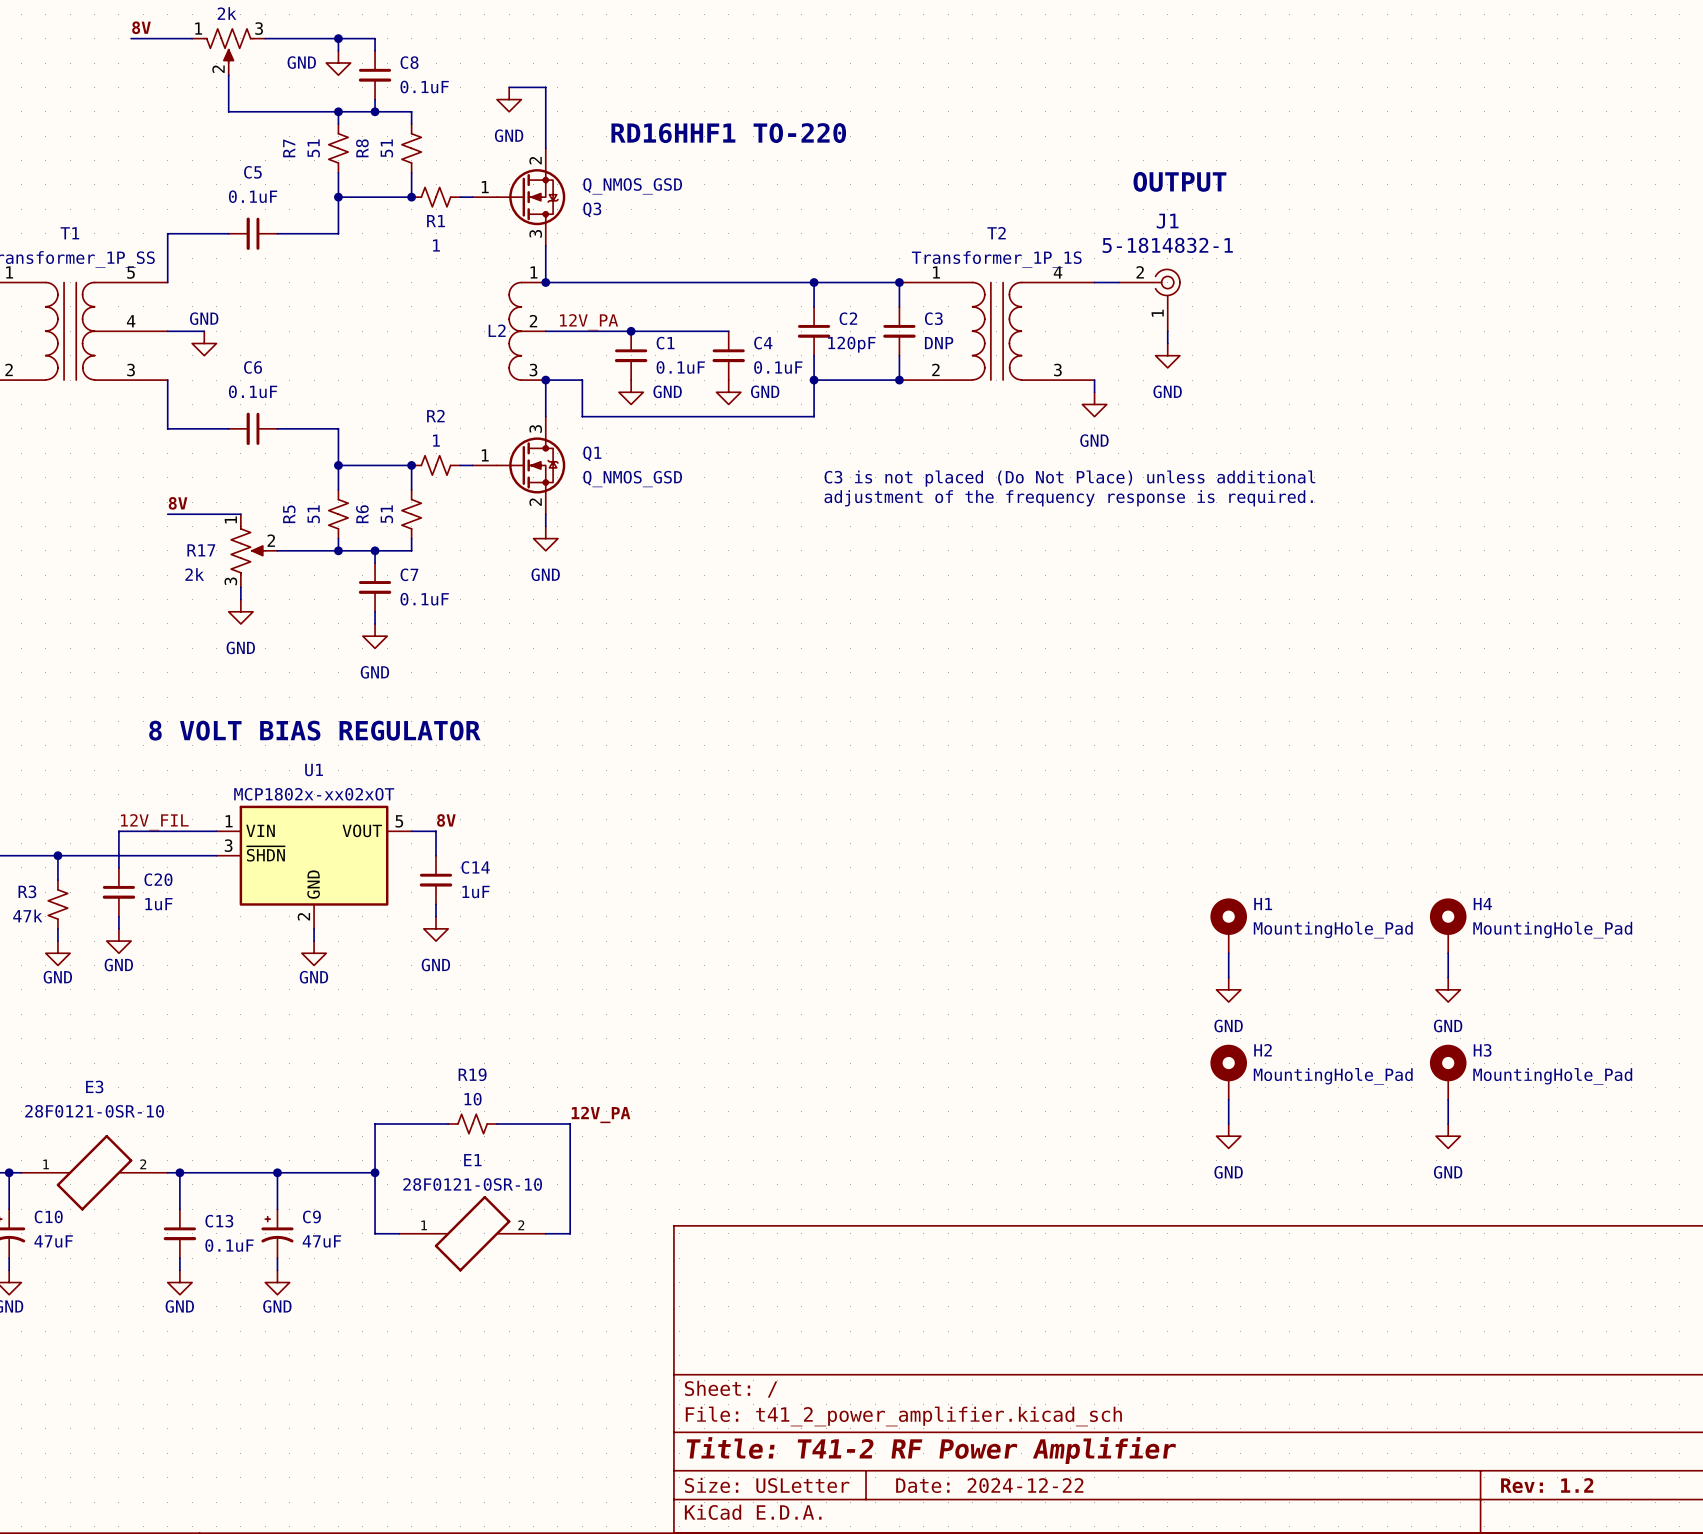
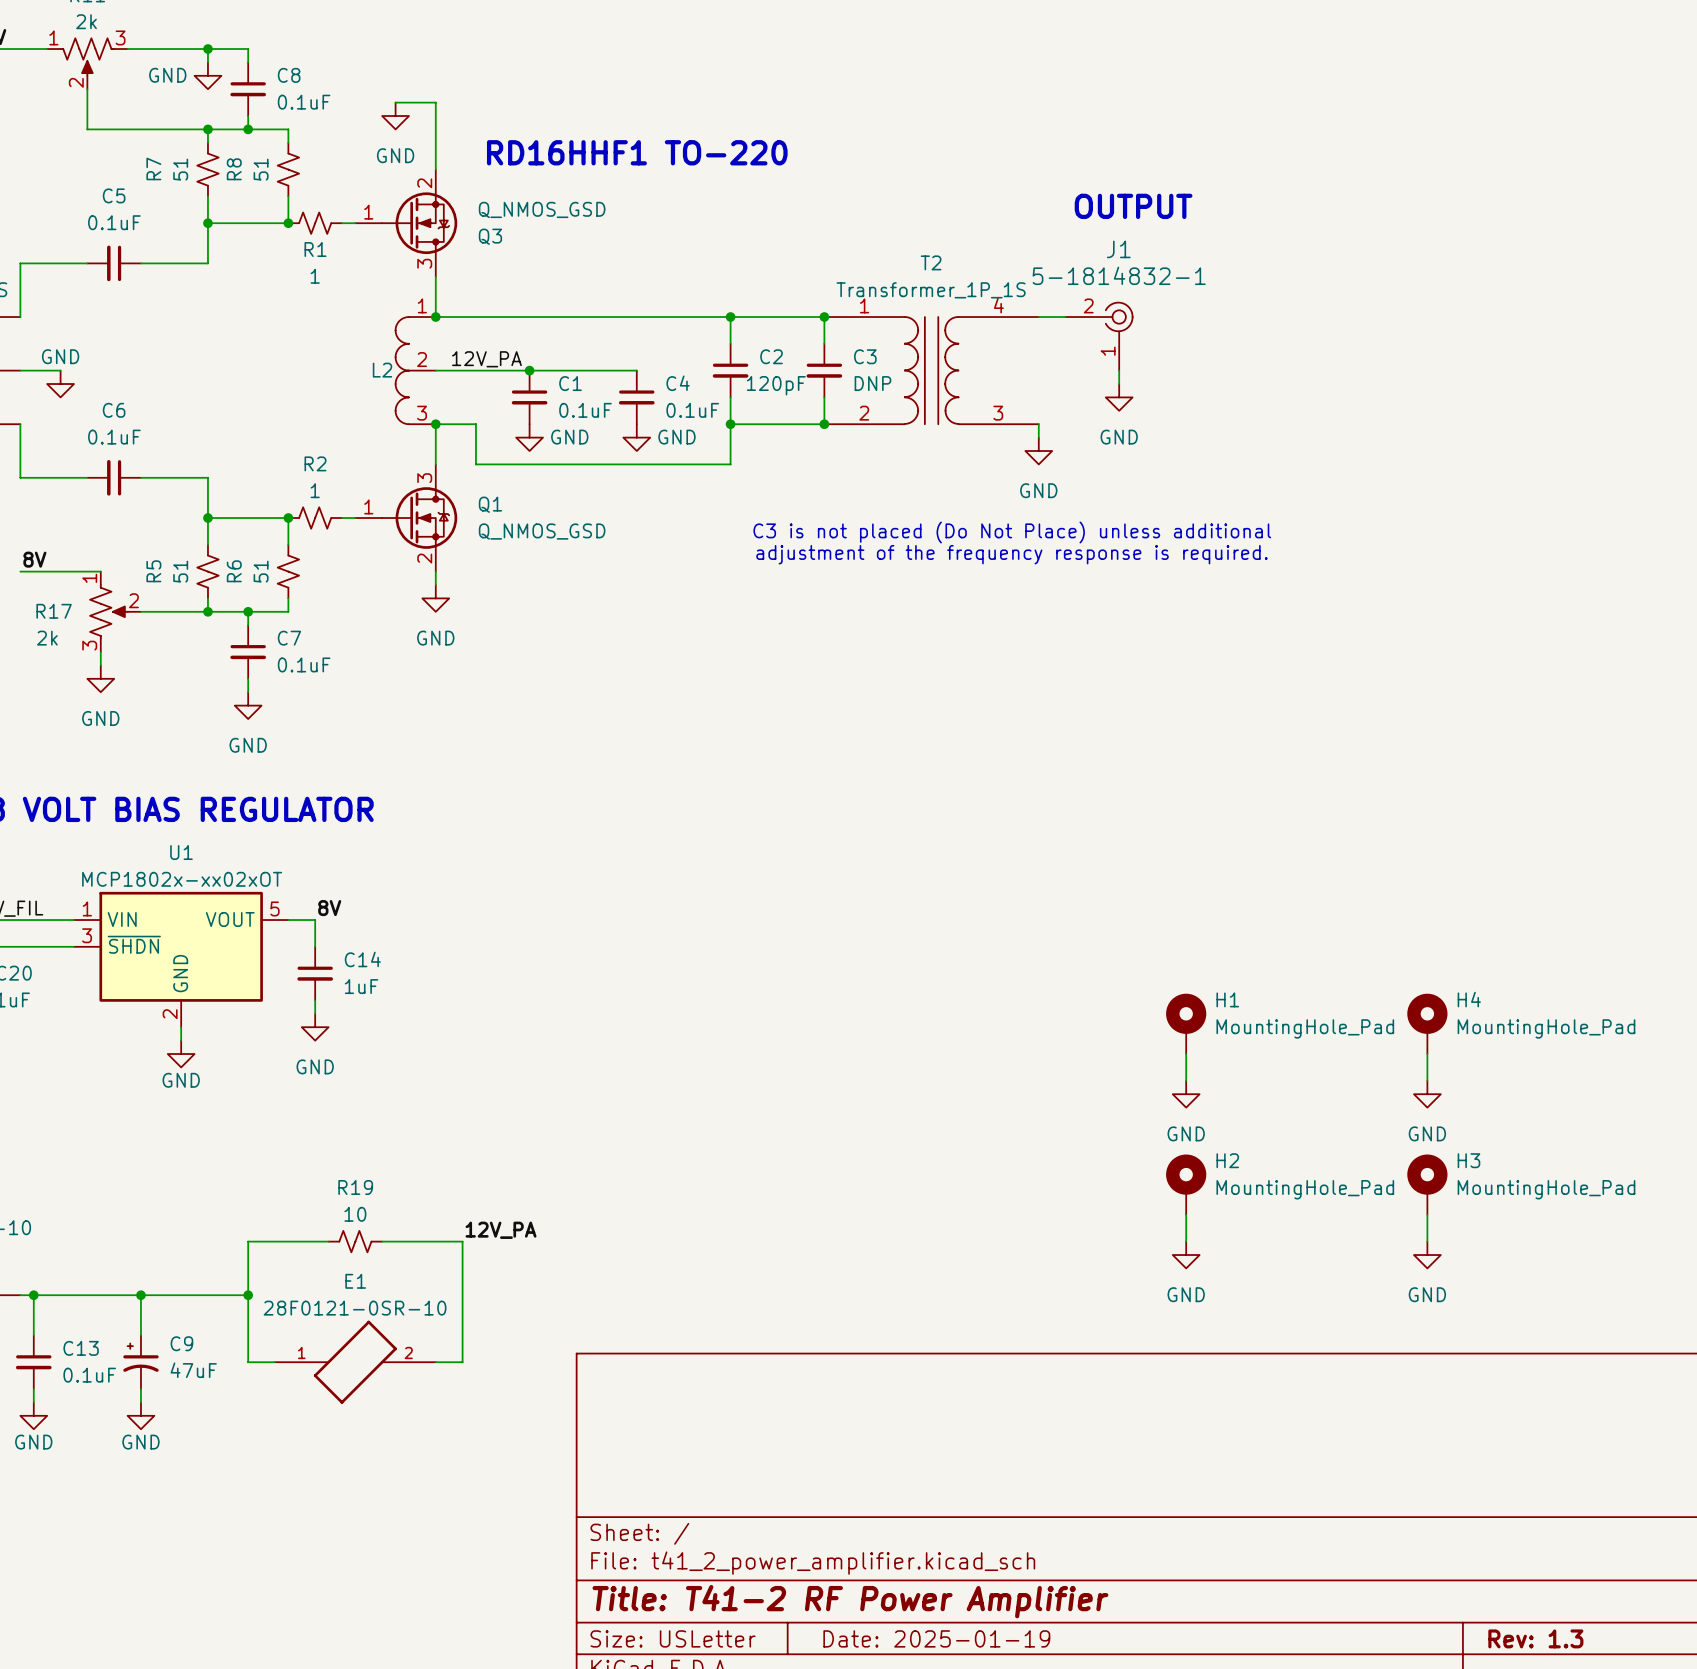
title block: Date: 2024-12-22 (989, 1485) -> Date: 2025-01-19 (936, 1638)
title block: Rev: 1.2 (1547, 1485) -> Rev: 1.3 (1535, 1638)

